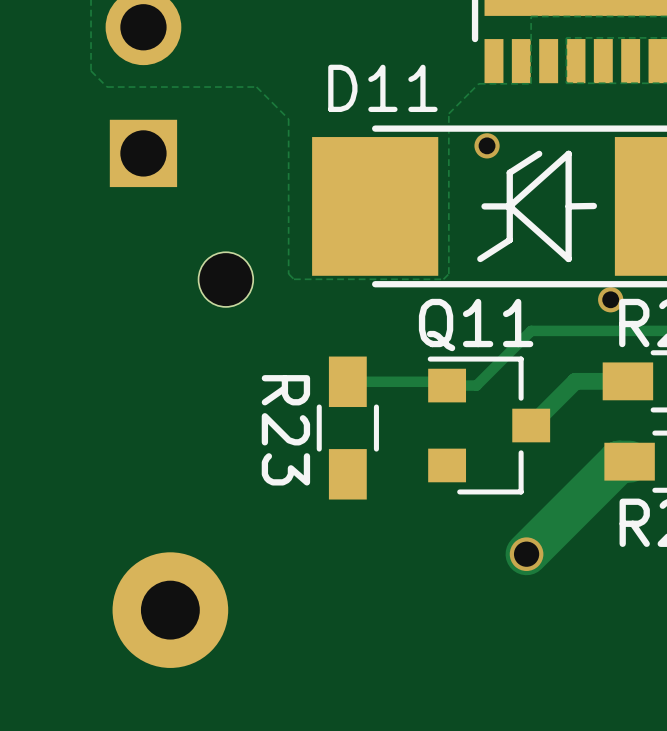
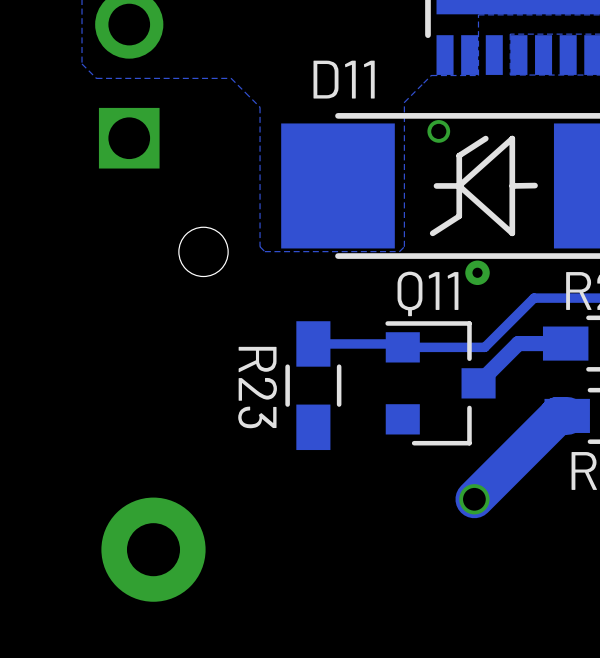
via: (610, 299) -> none
via: none -> (477, 272)
track: (592, 330) (531, 330) (476, 385) -> (534, 298) (484, 347) (429, 347)

